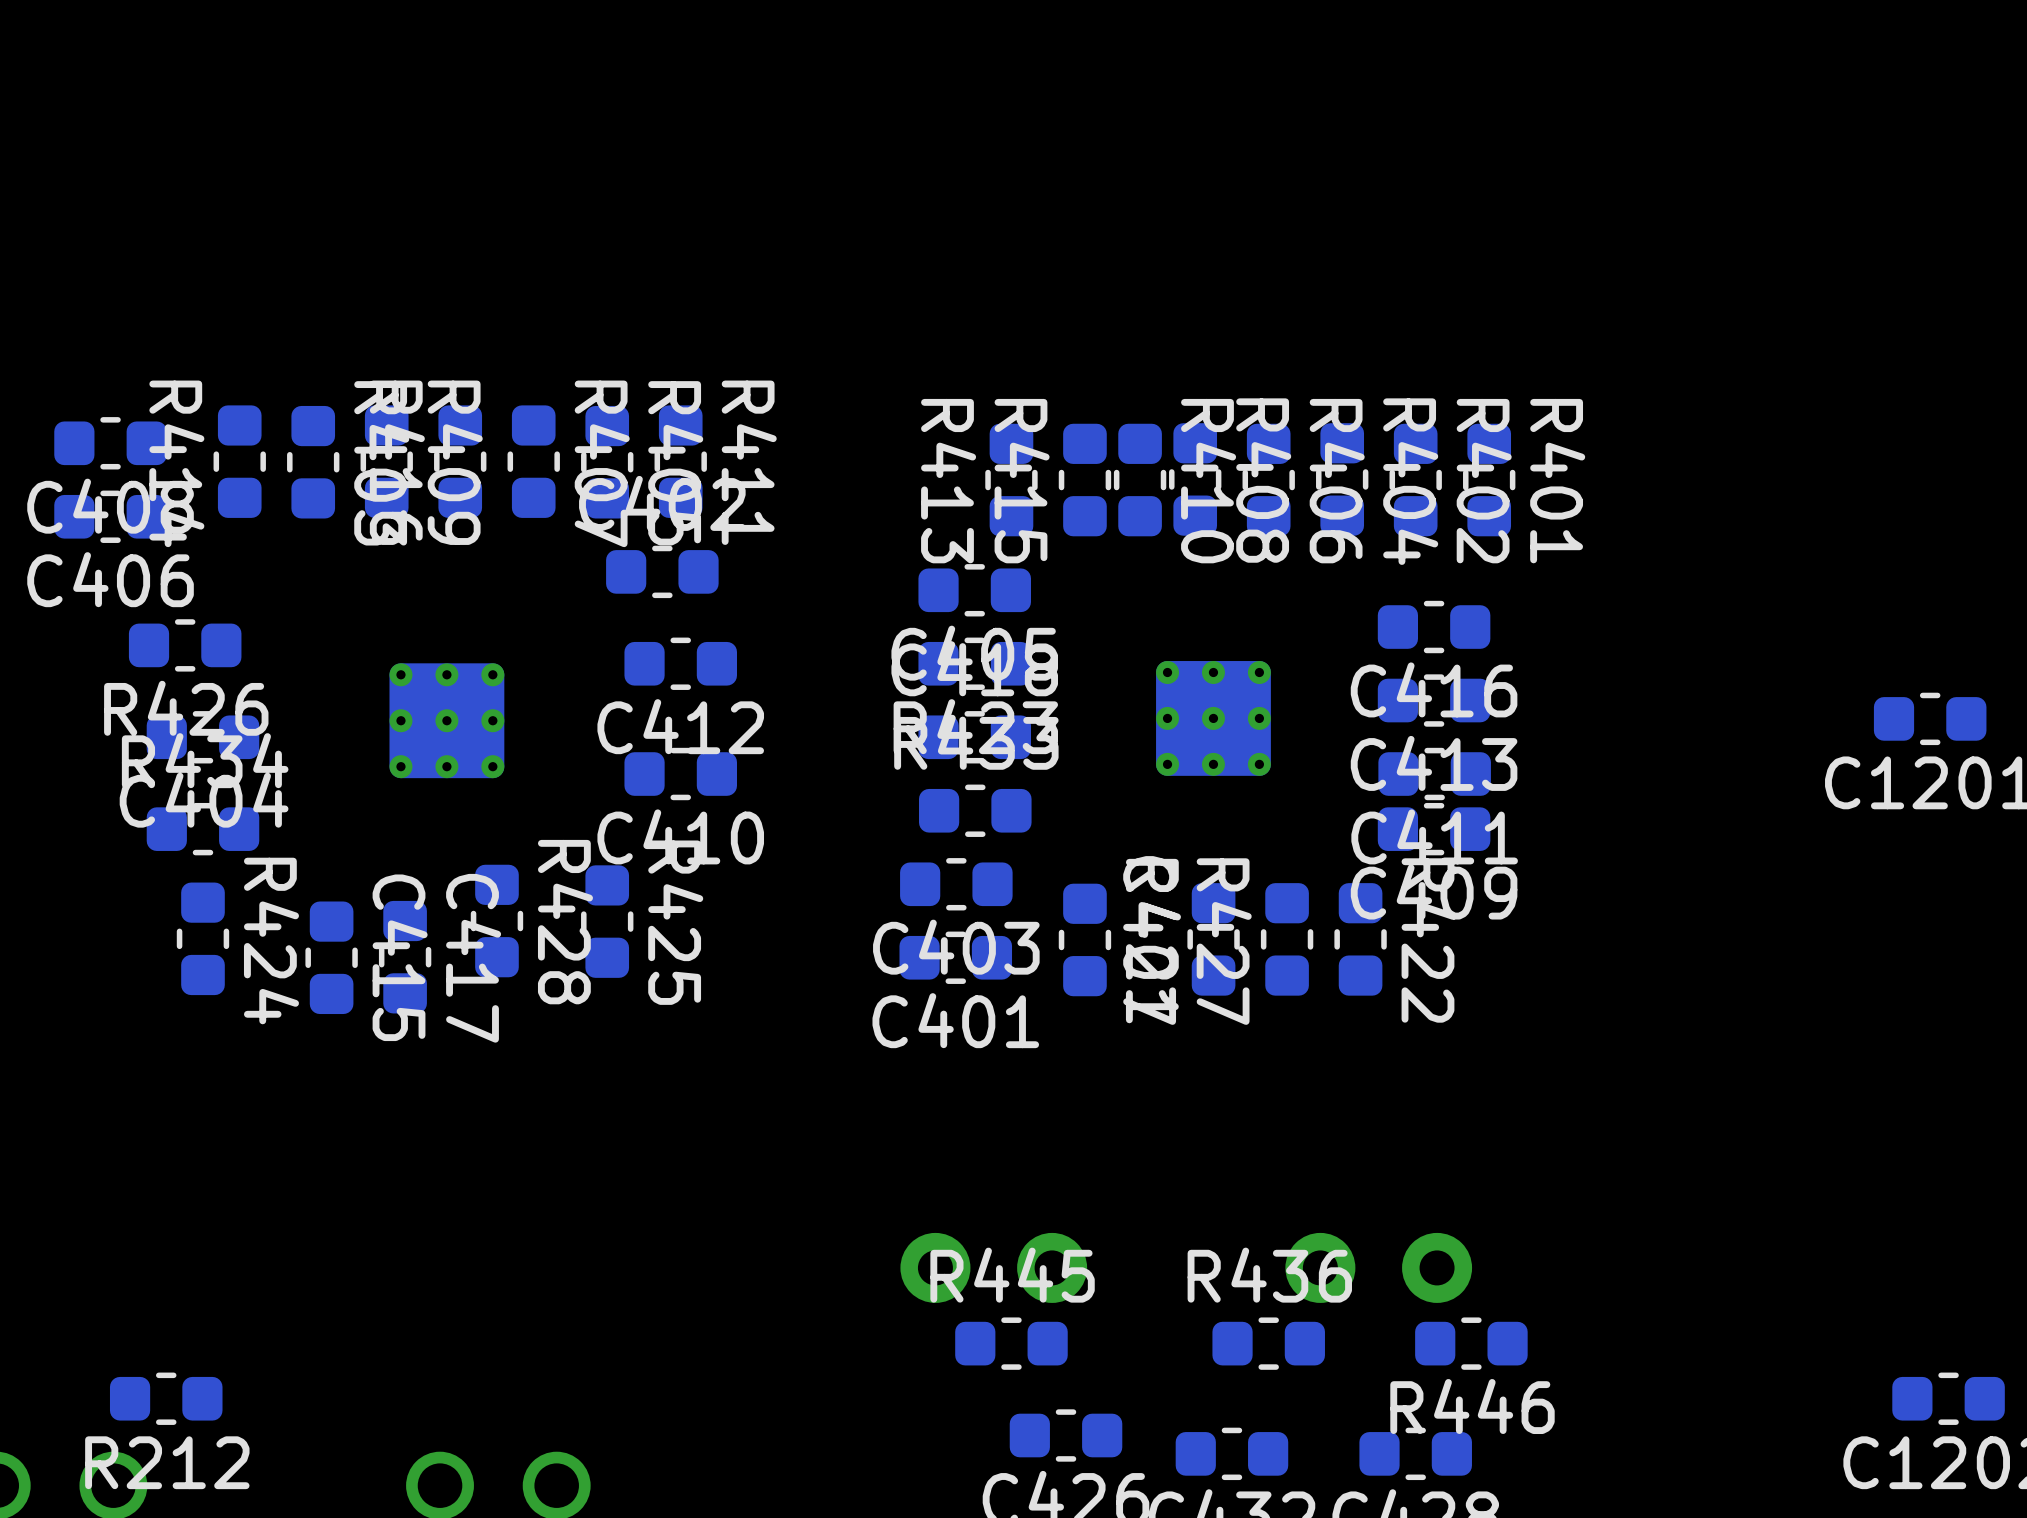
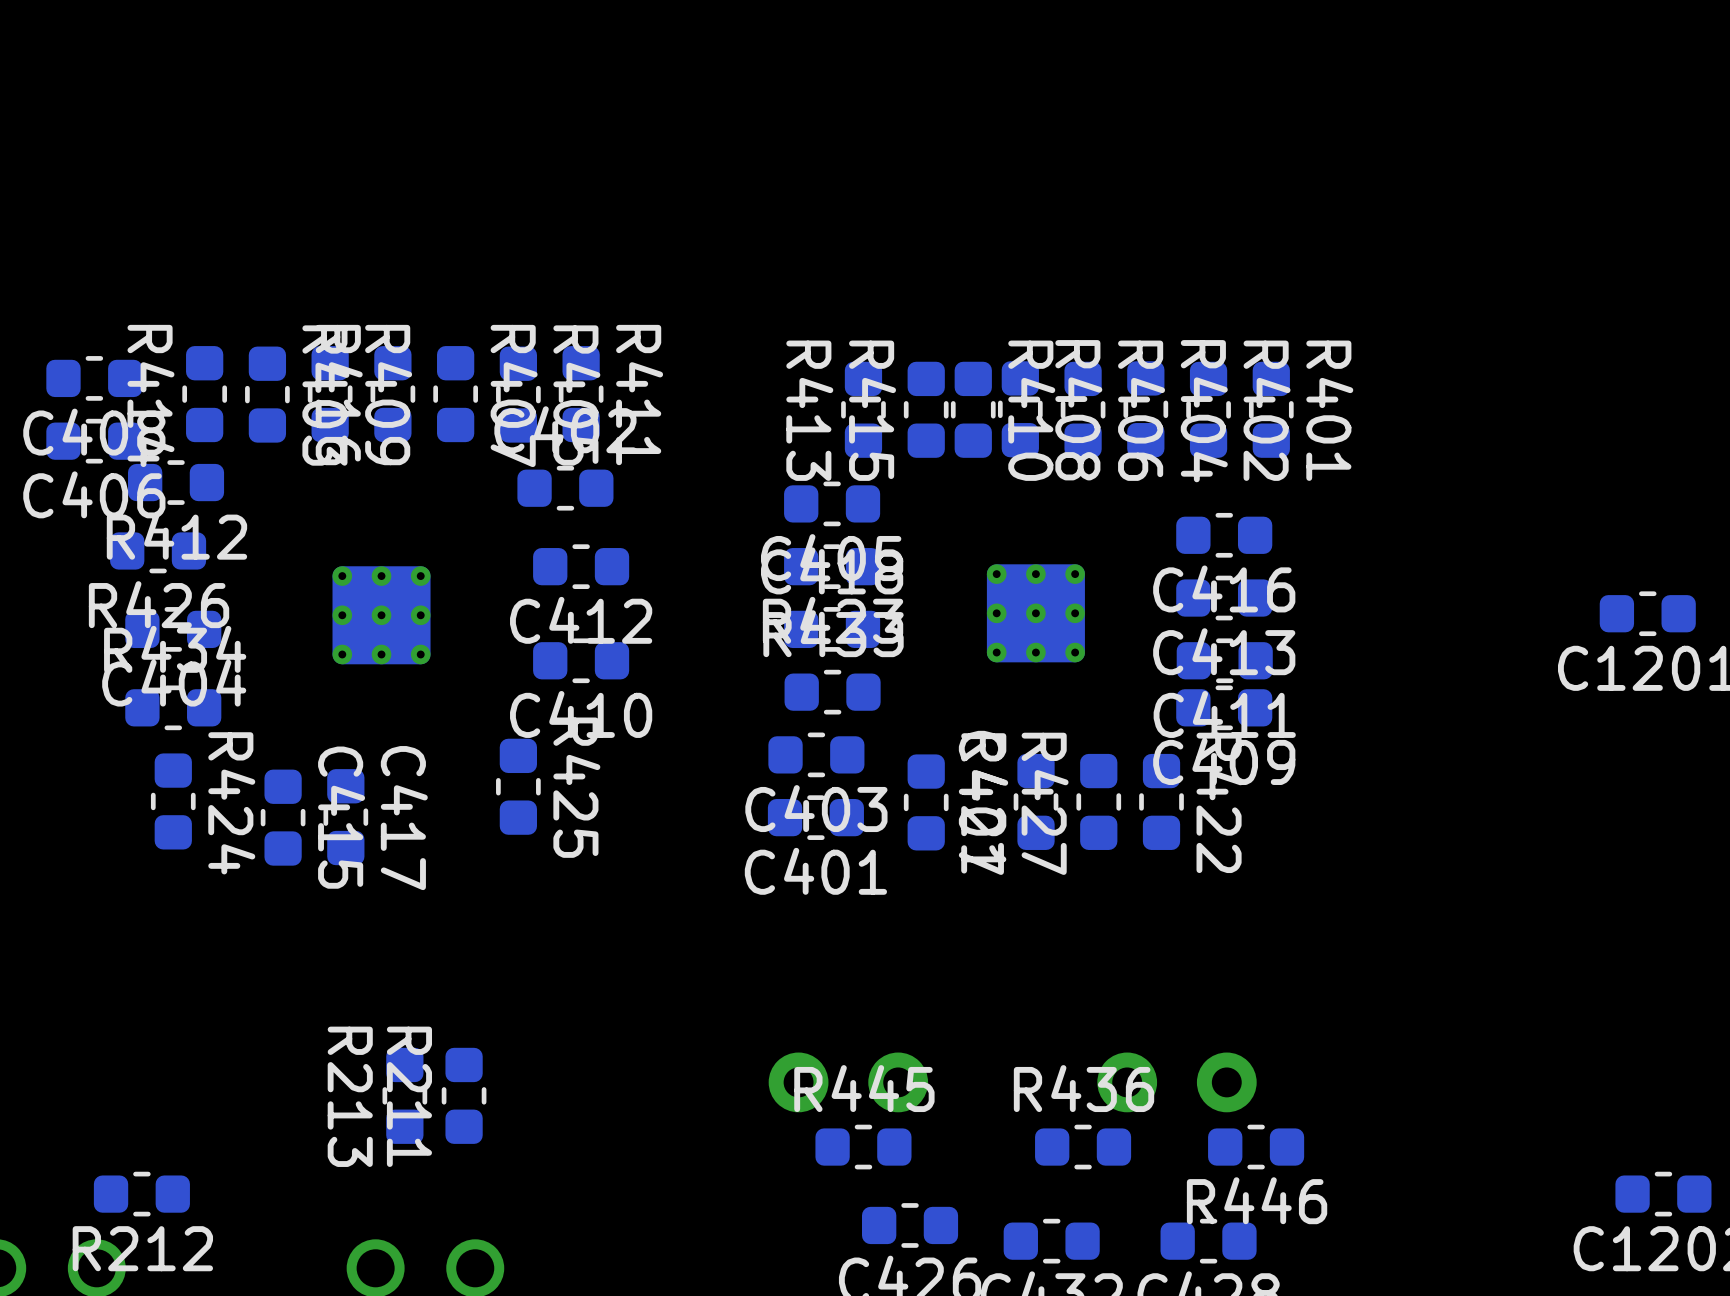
R412: none -> (176, 482)
R428: (496, 921) -> none
R213: none -> (404, 1095)
R211: none -> (464, 1095)

